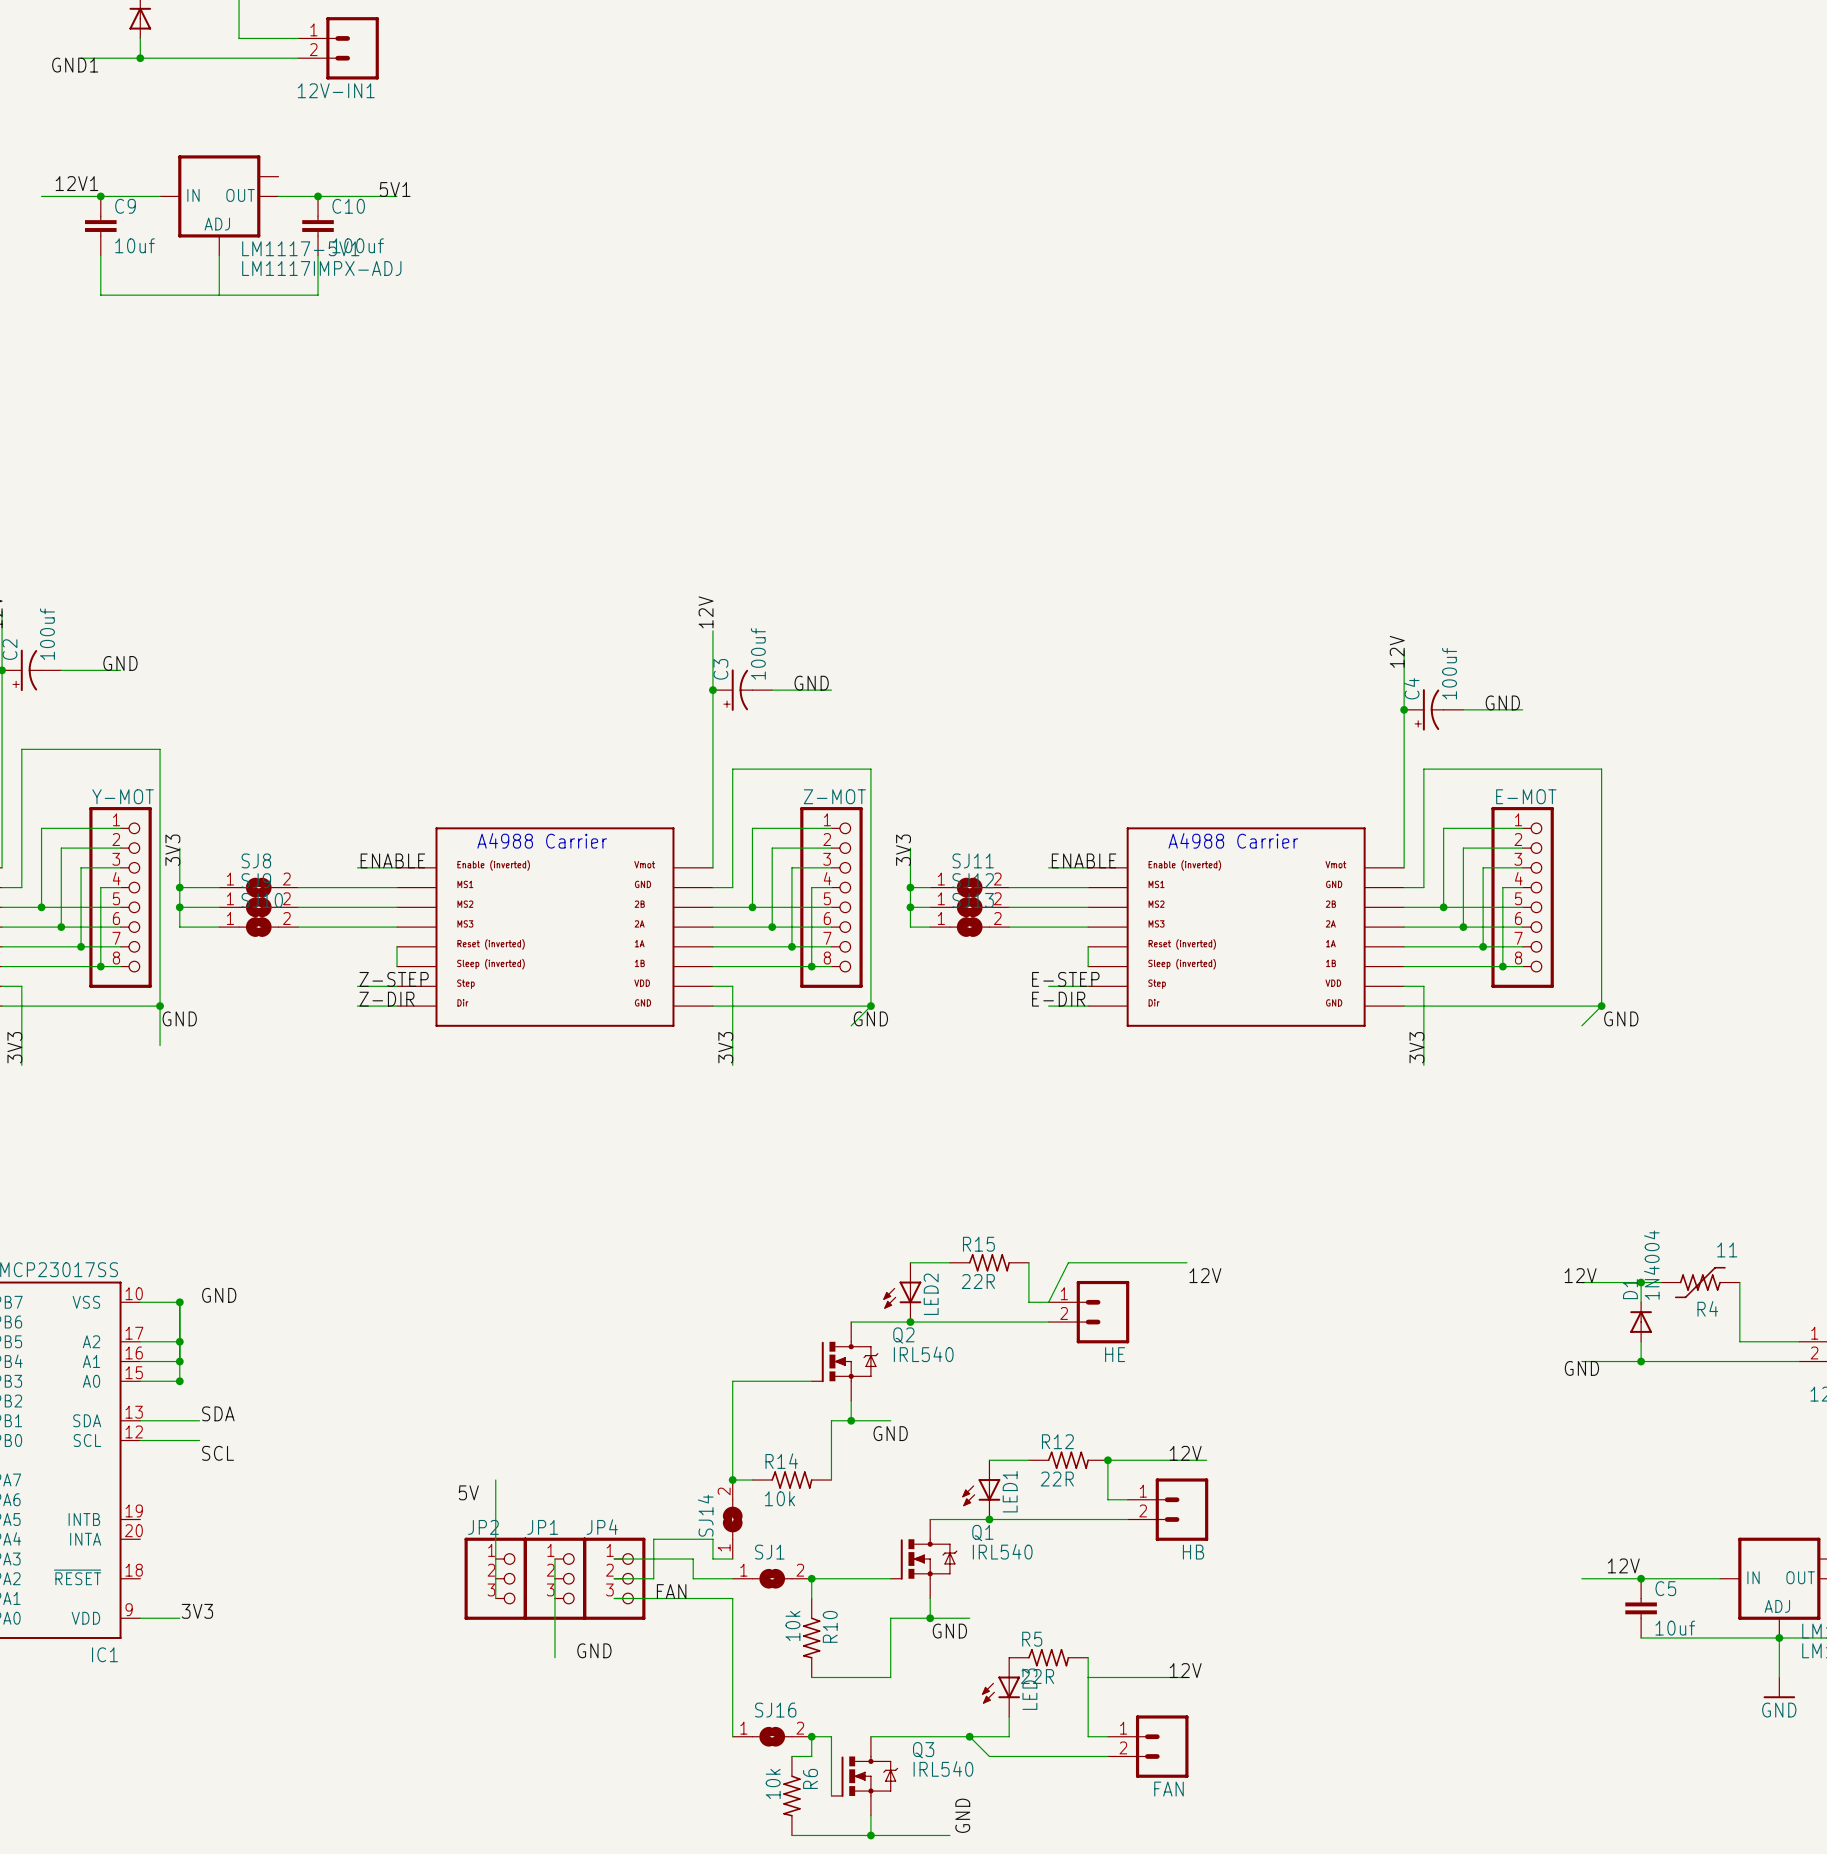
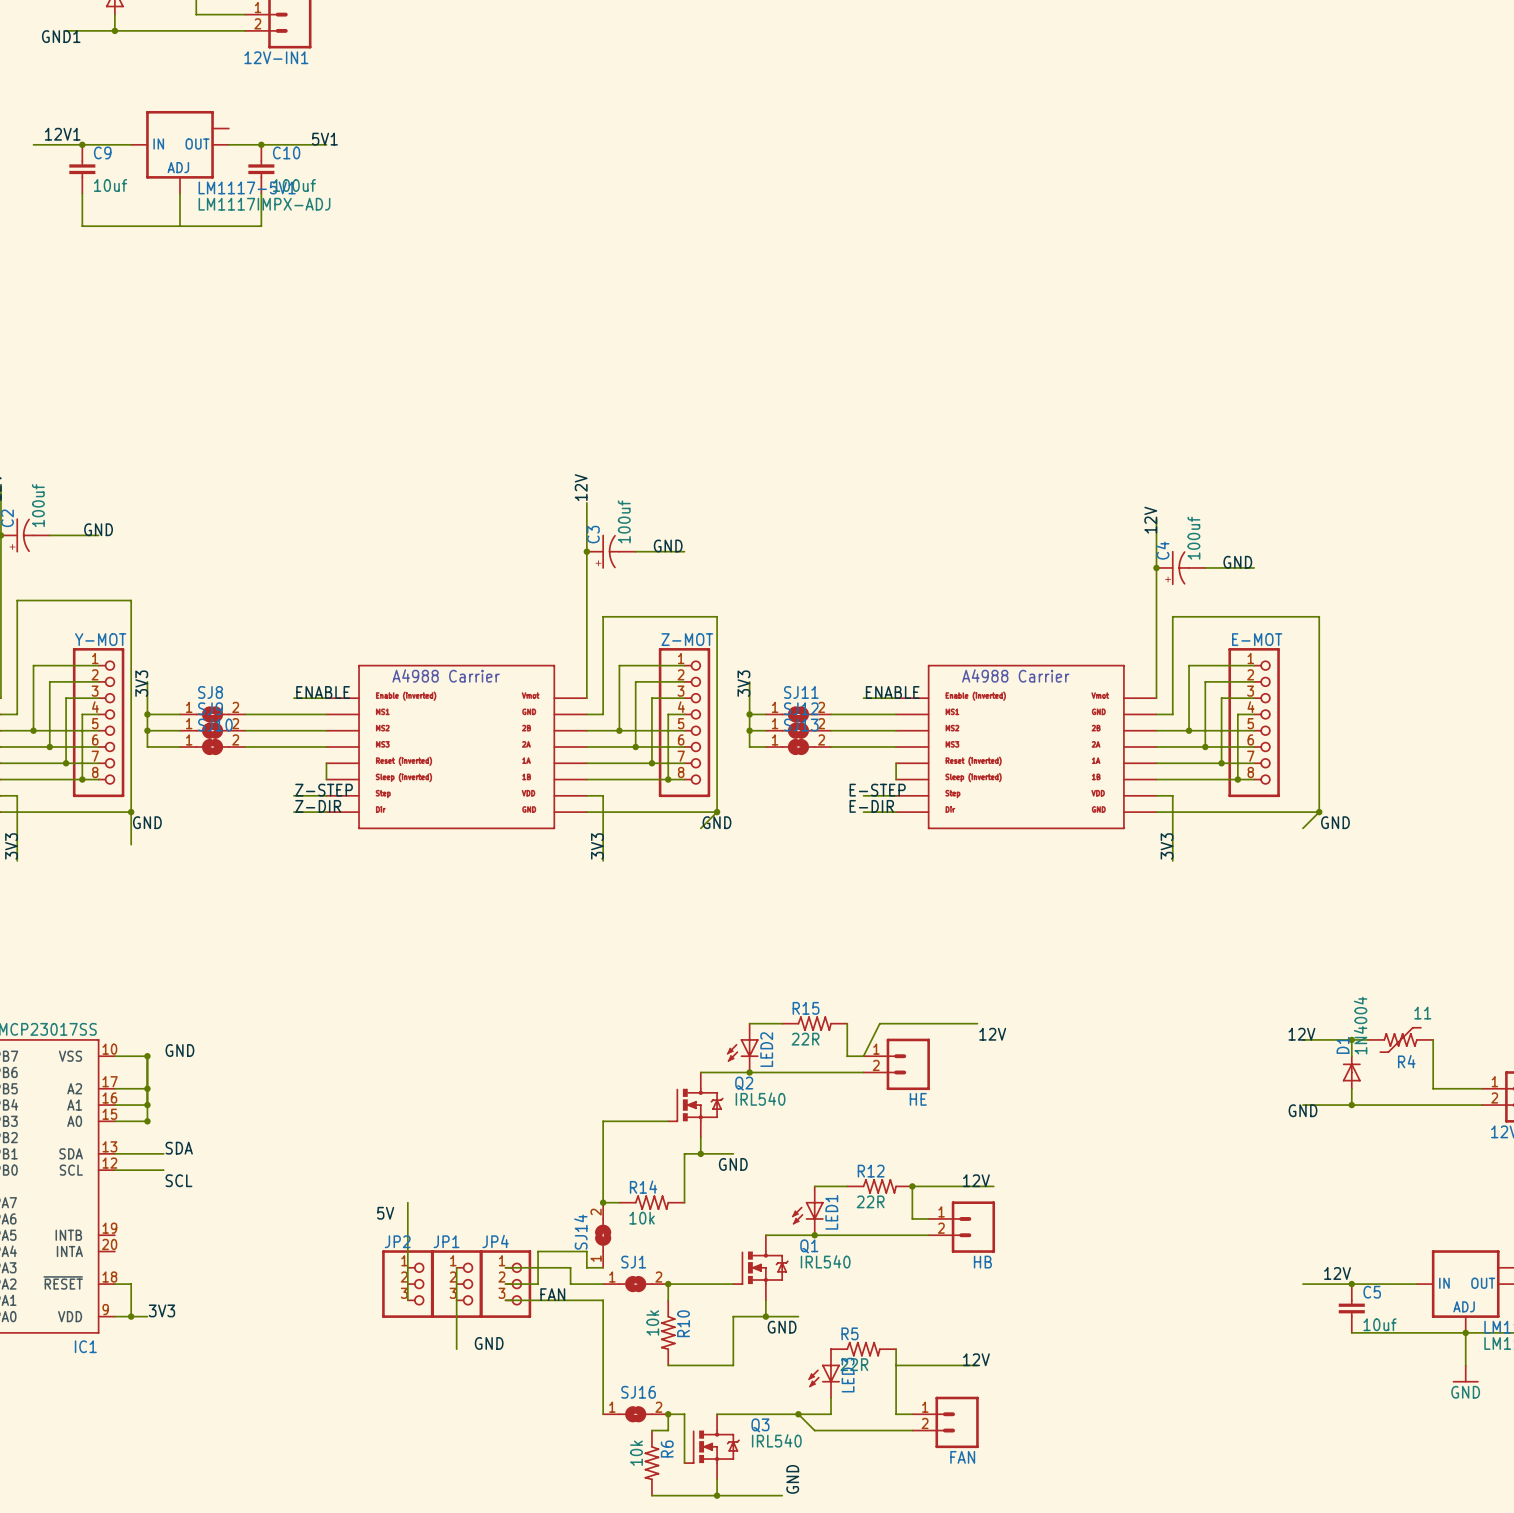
wire: none -> (114, 1284) (131, 1284) (131, 1316)
junction: none -> (131, 1316)

